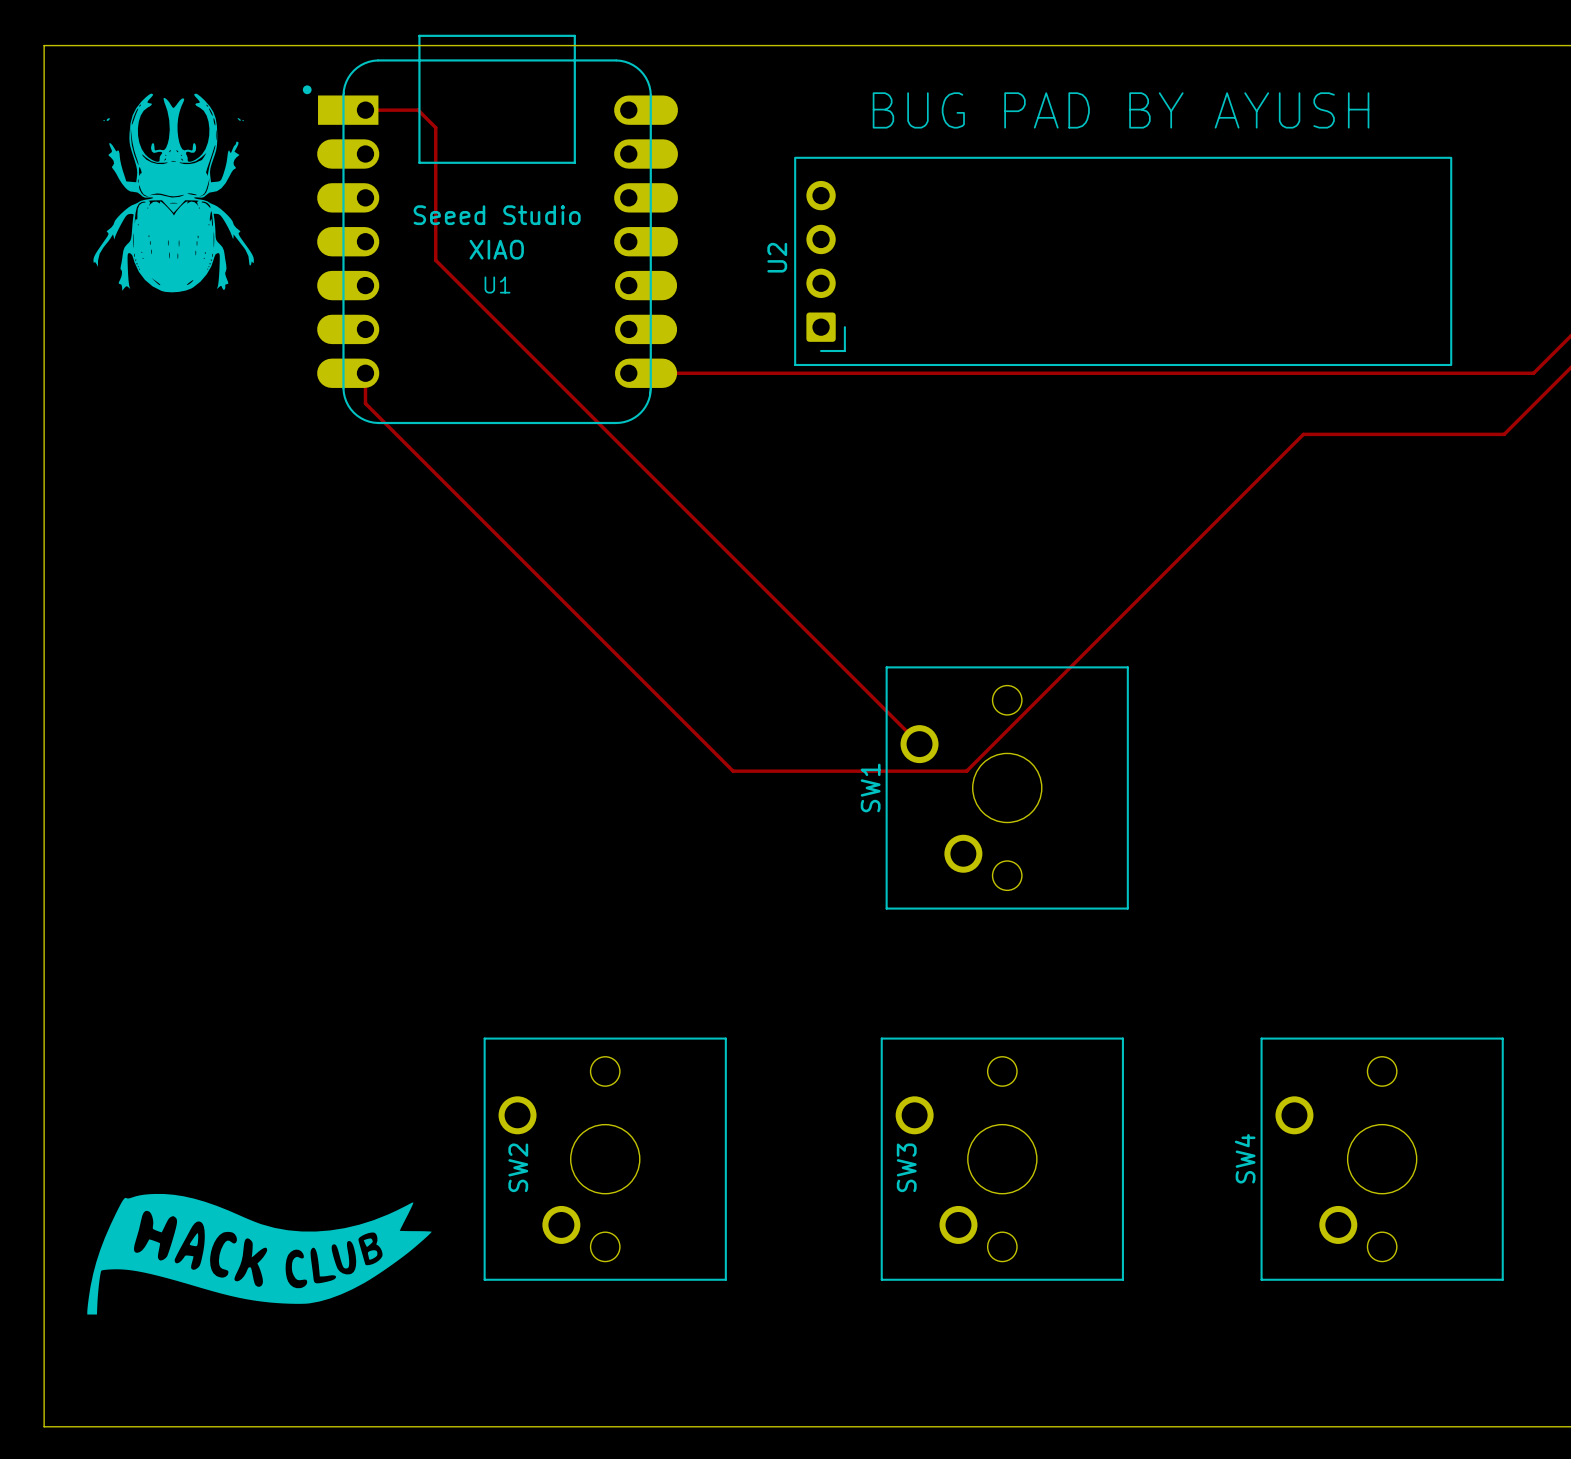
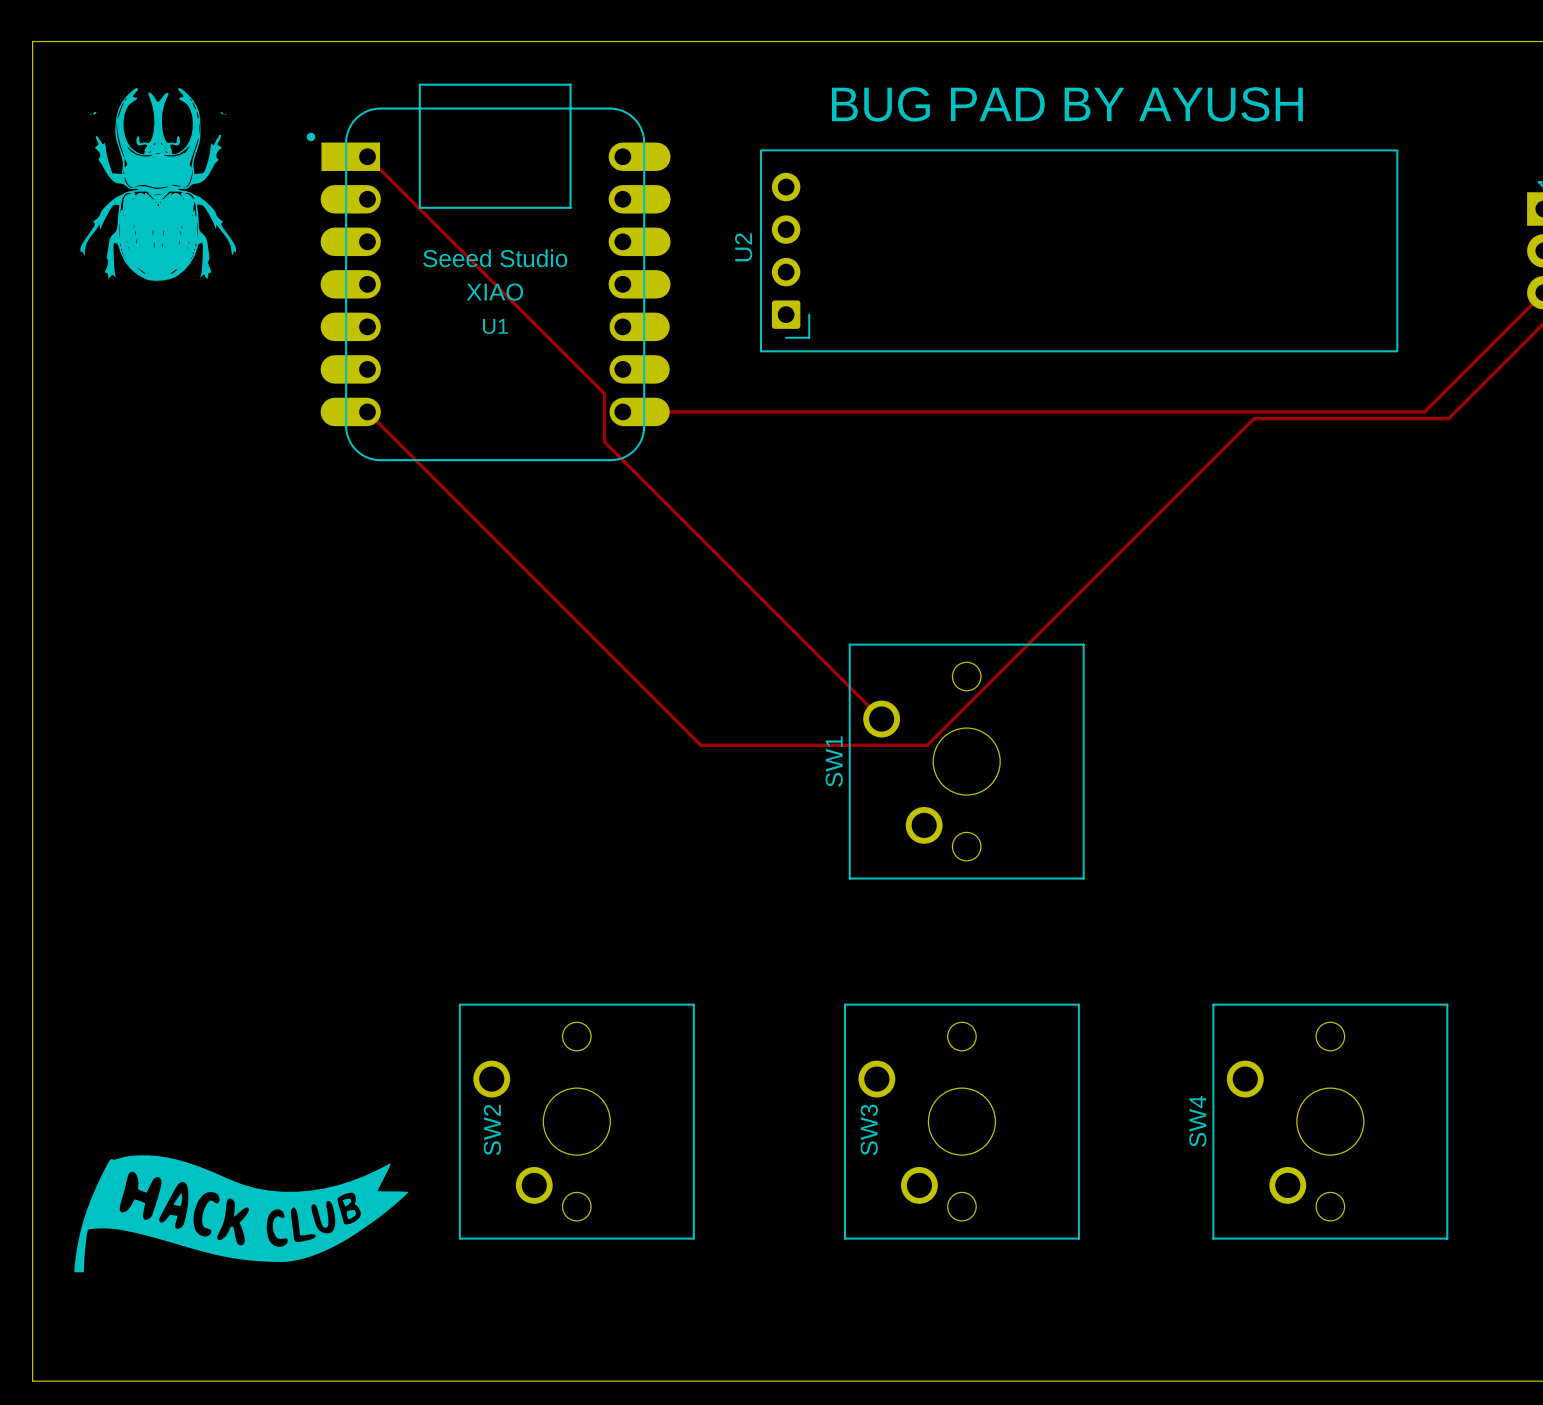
drawing: [93, 93, 254, 293] -> none
track: (365, 110) (418, 110) (435, 127) (435, 260) (633, 458) -> (367, 156) (604, 393) (604, 441)
part: none -> (158, 184)
U1 position: (490, 229) -> (488, 272)
track: (365, 373) (365, 403) (389, 427) -> none
track: (628, 373) (1533, 373) -> (622, 411) (1424, 411) (1477, 359)

